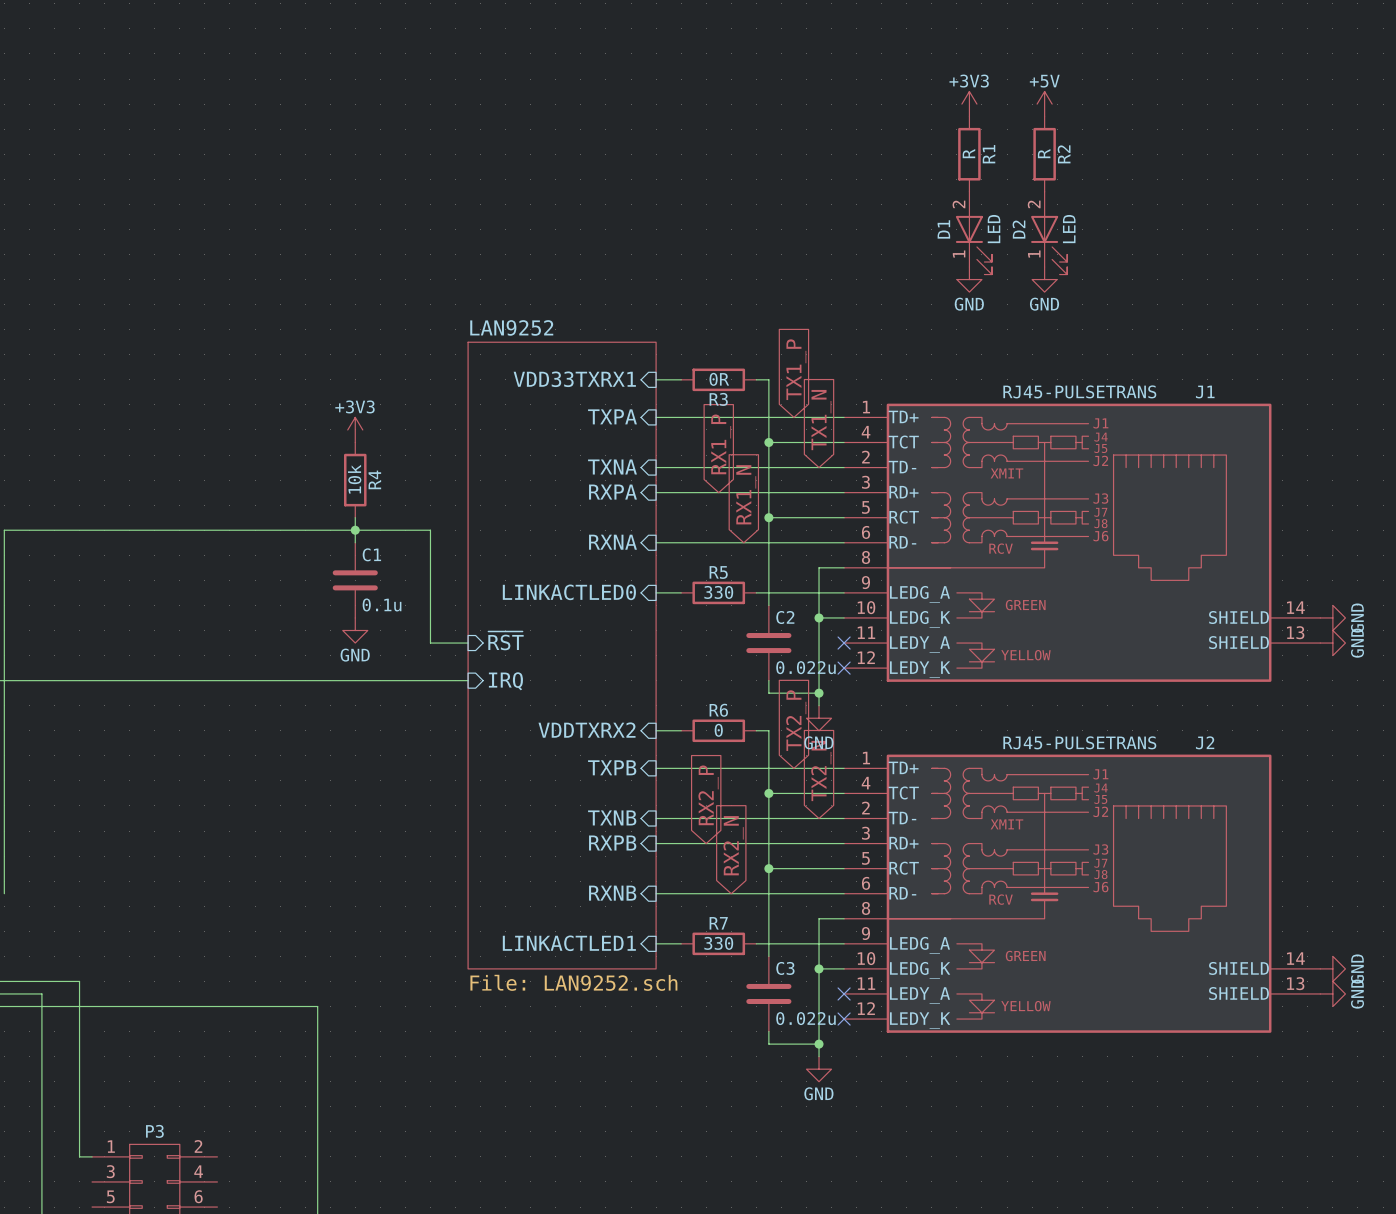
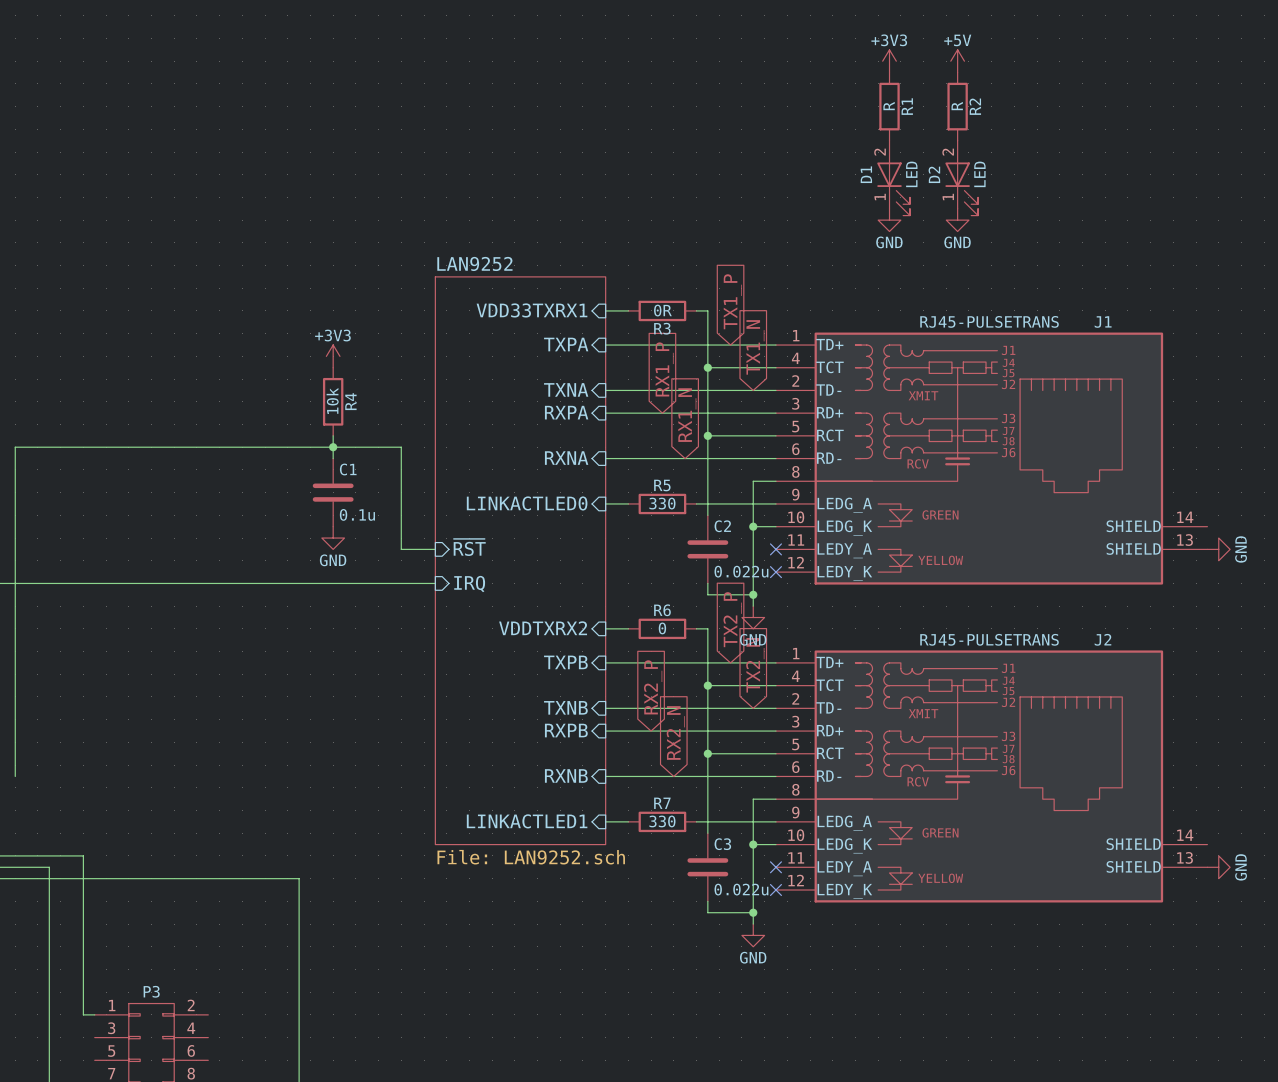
power symbol: GND (1332, 617) -> none
power symbol: GND (1332, 968) -> none

